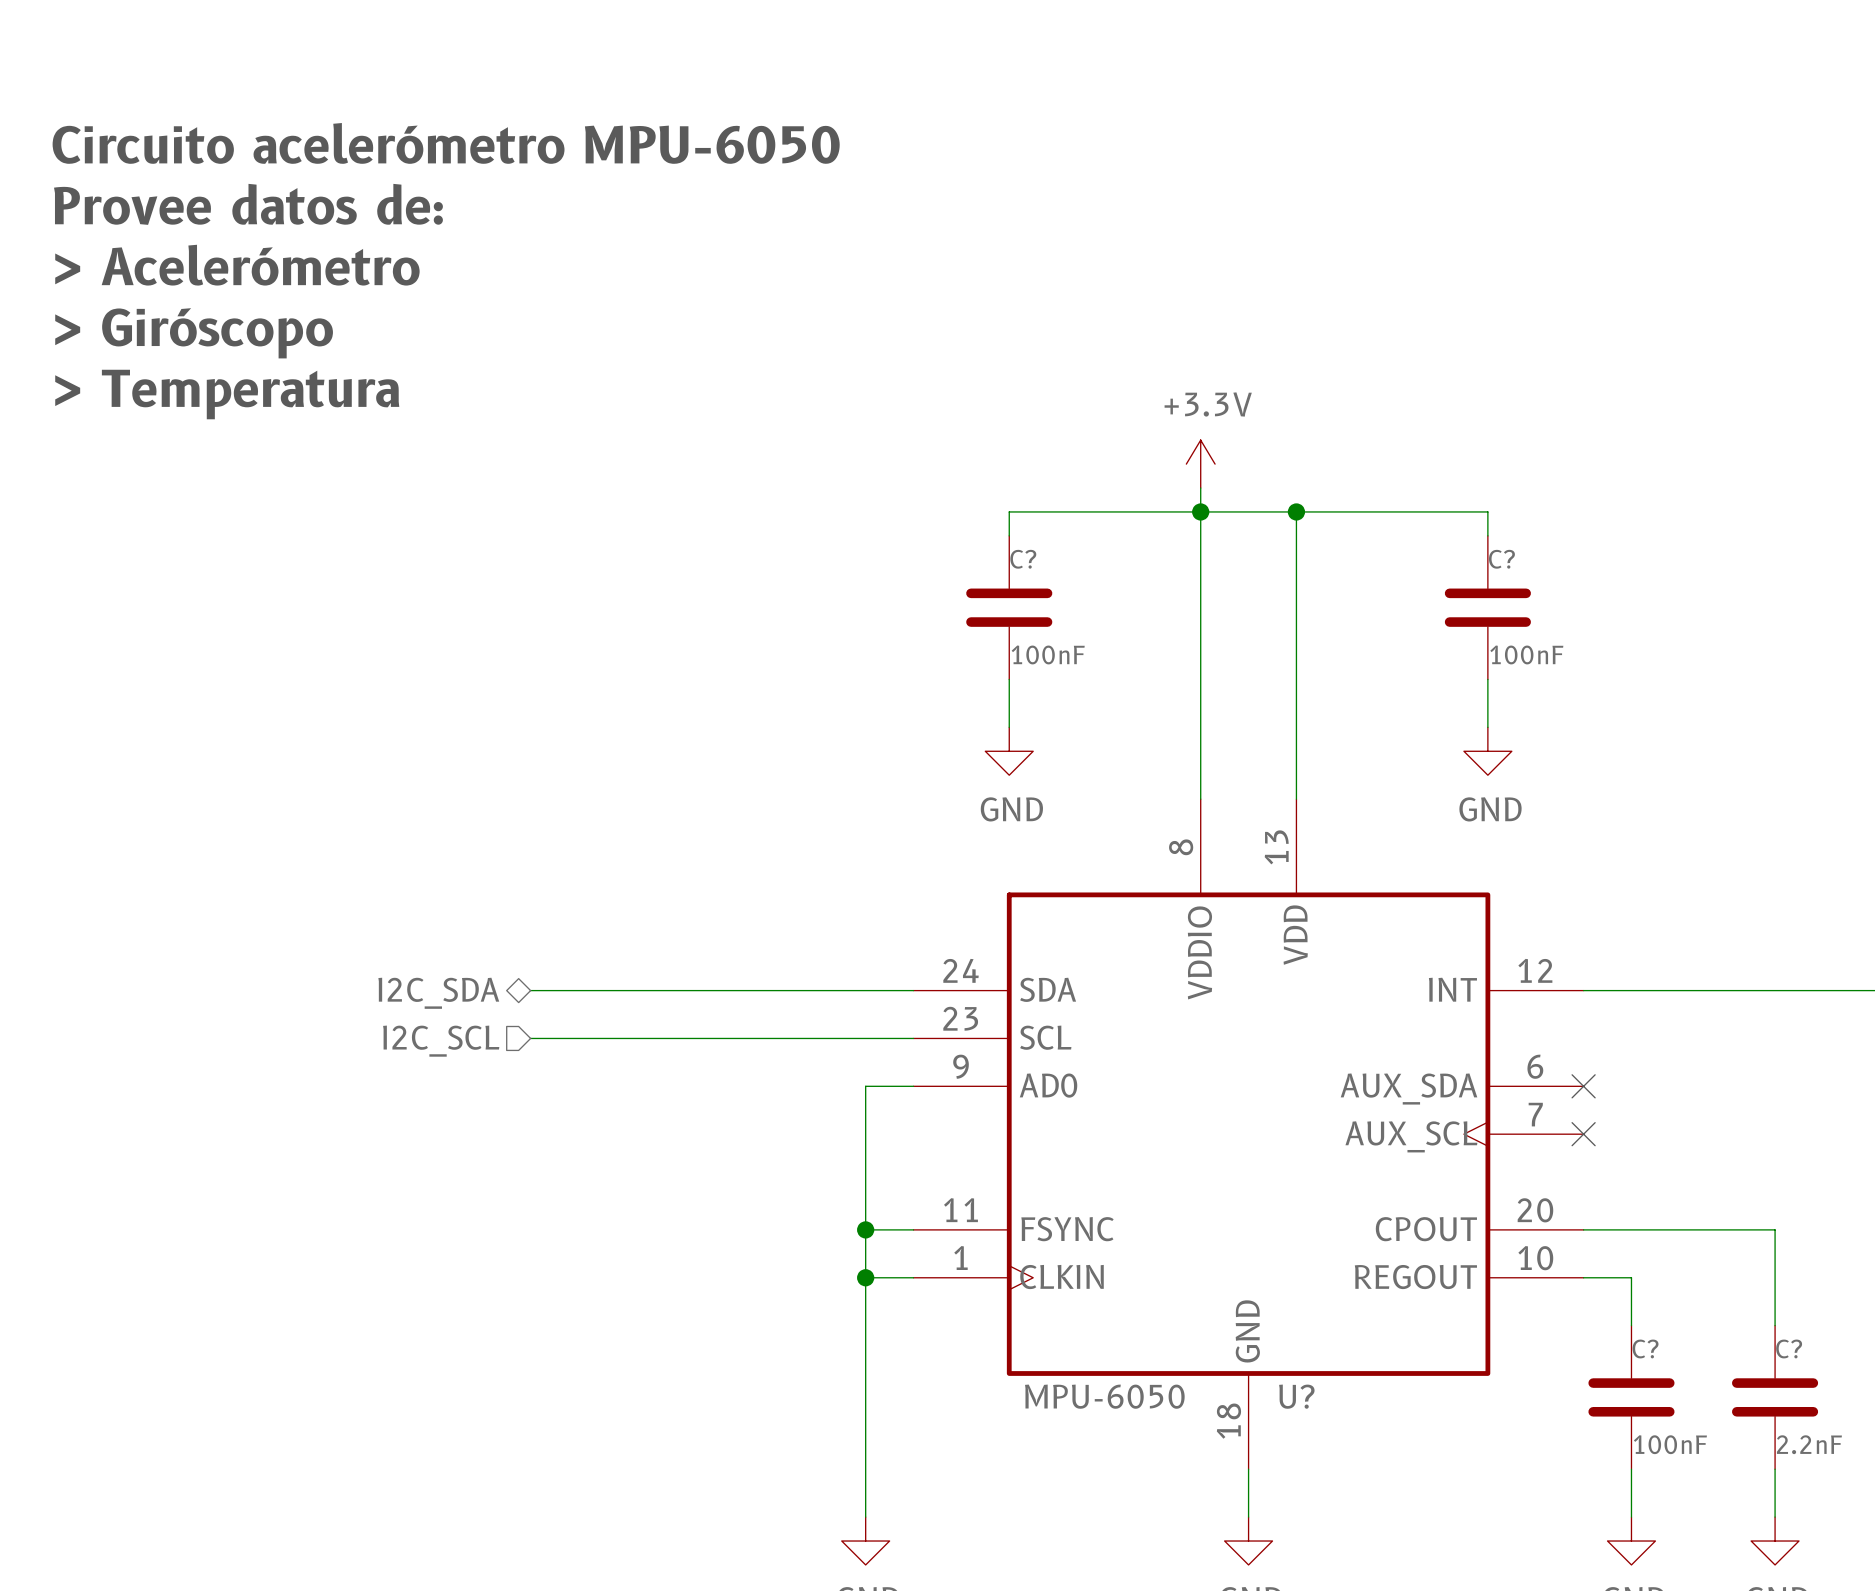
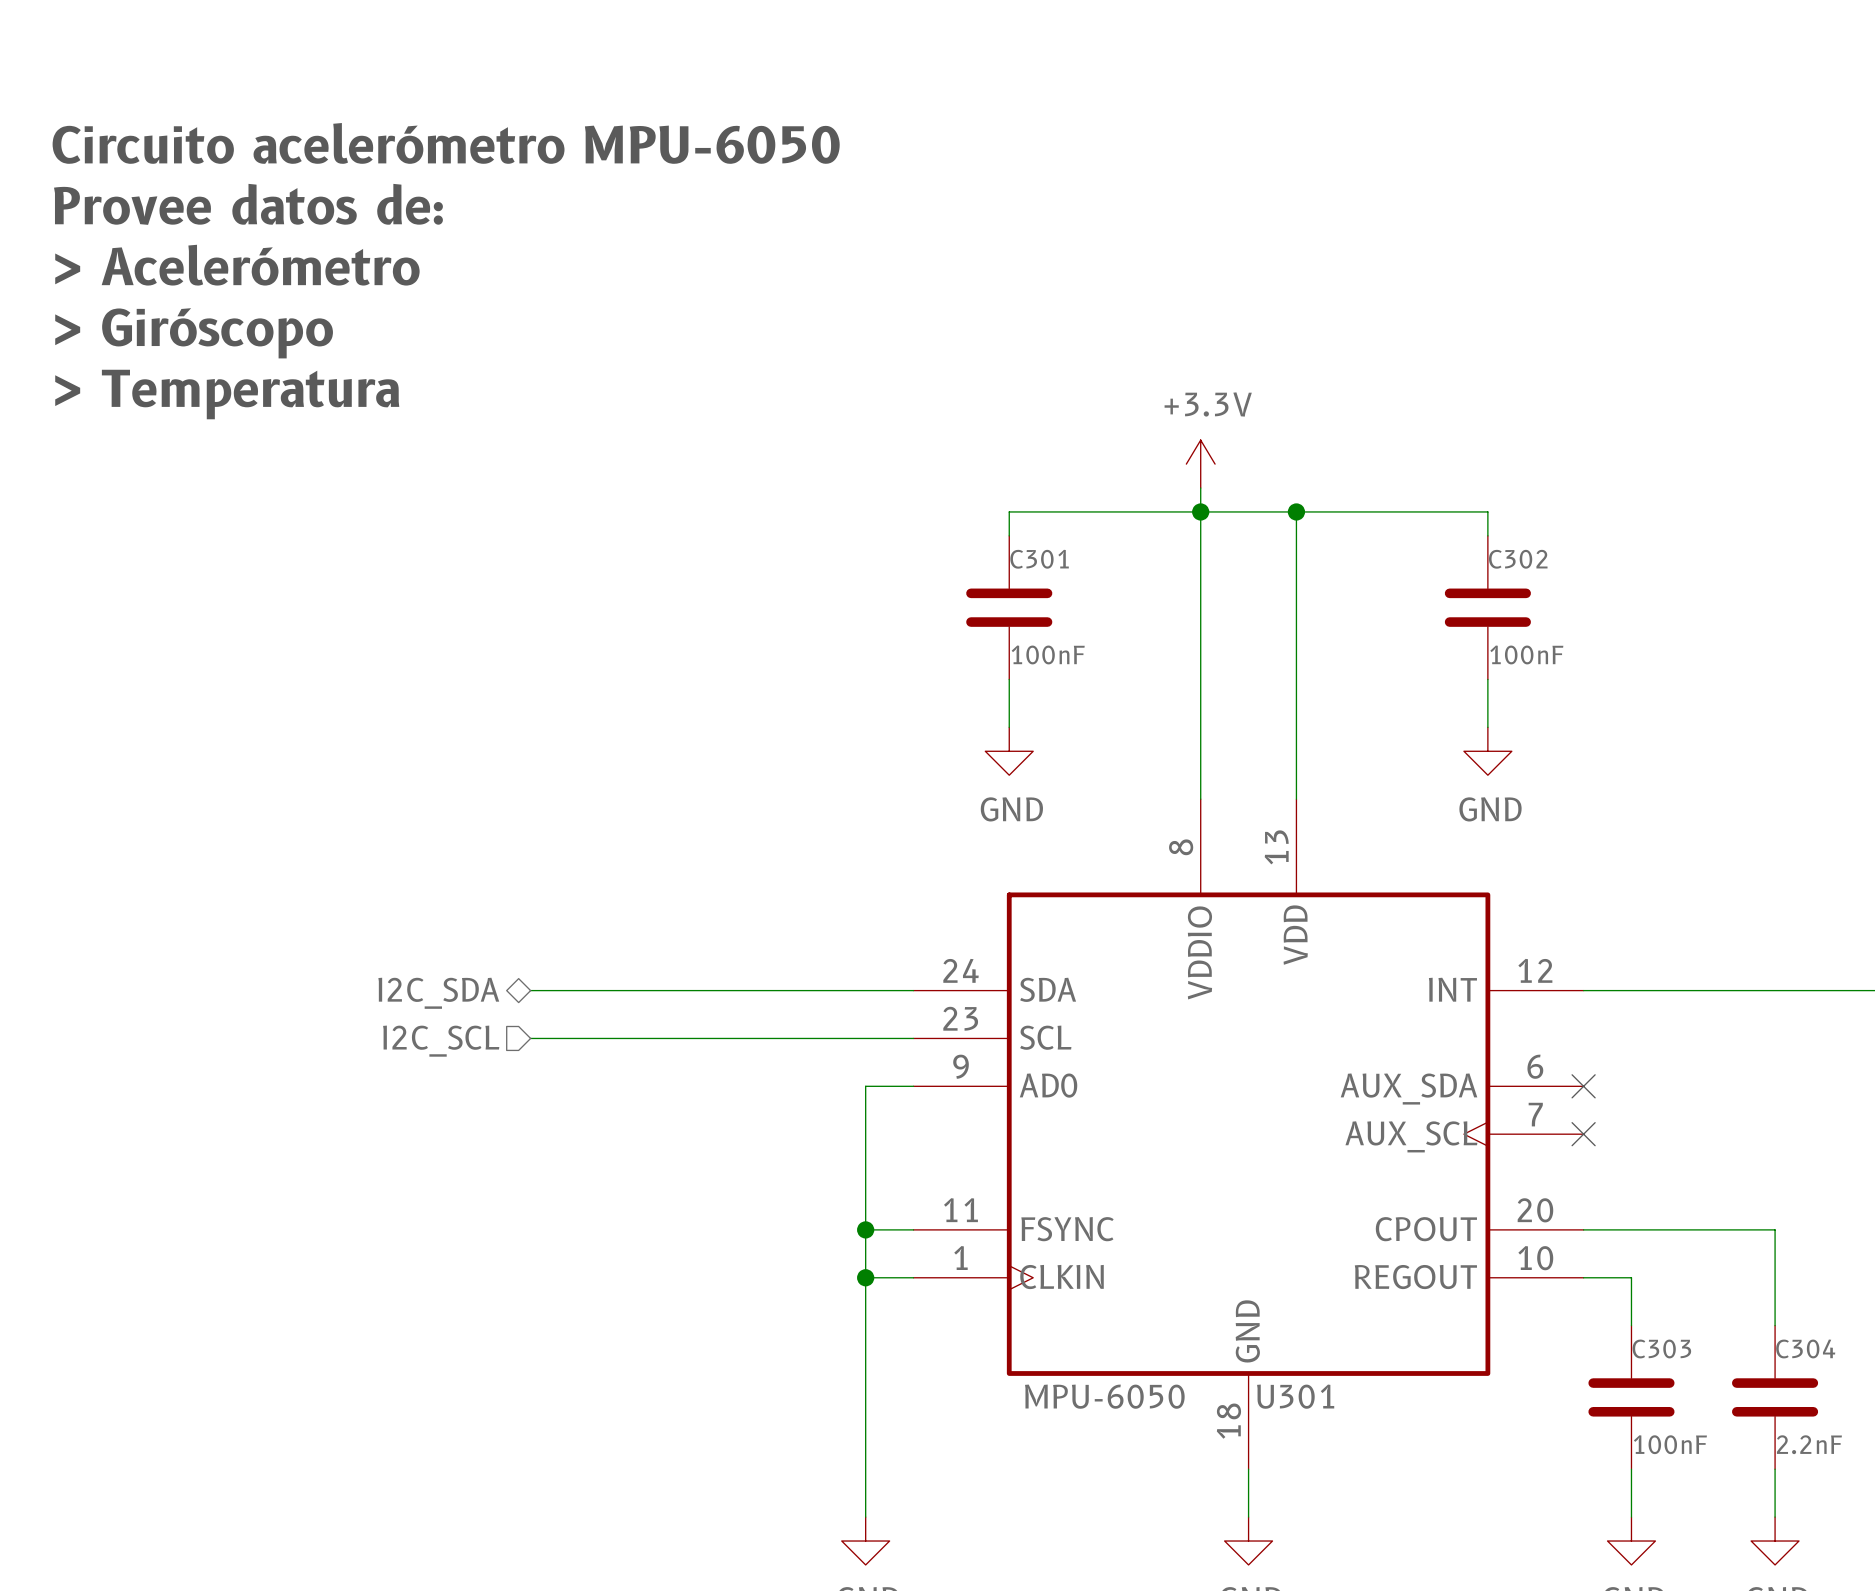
C? name: C? (1023, 559) -> C301 (1039, 559)
C? name: C? (1501, 559) -> C302 (1518, 559)
C? name: C? (1645, 1348) -> C303 (1661, 1348)
C? name: C? (1789, 1348) -> C304 (1805, 1348)
U? name: U? (1296, 1396) -> U301 (1295, 1396)

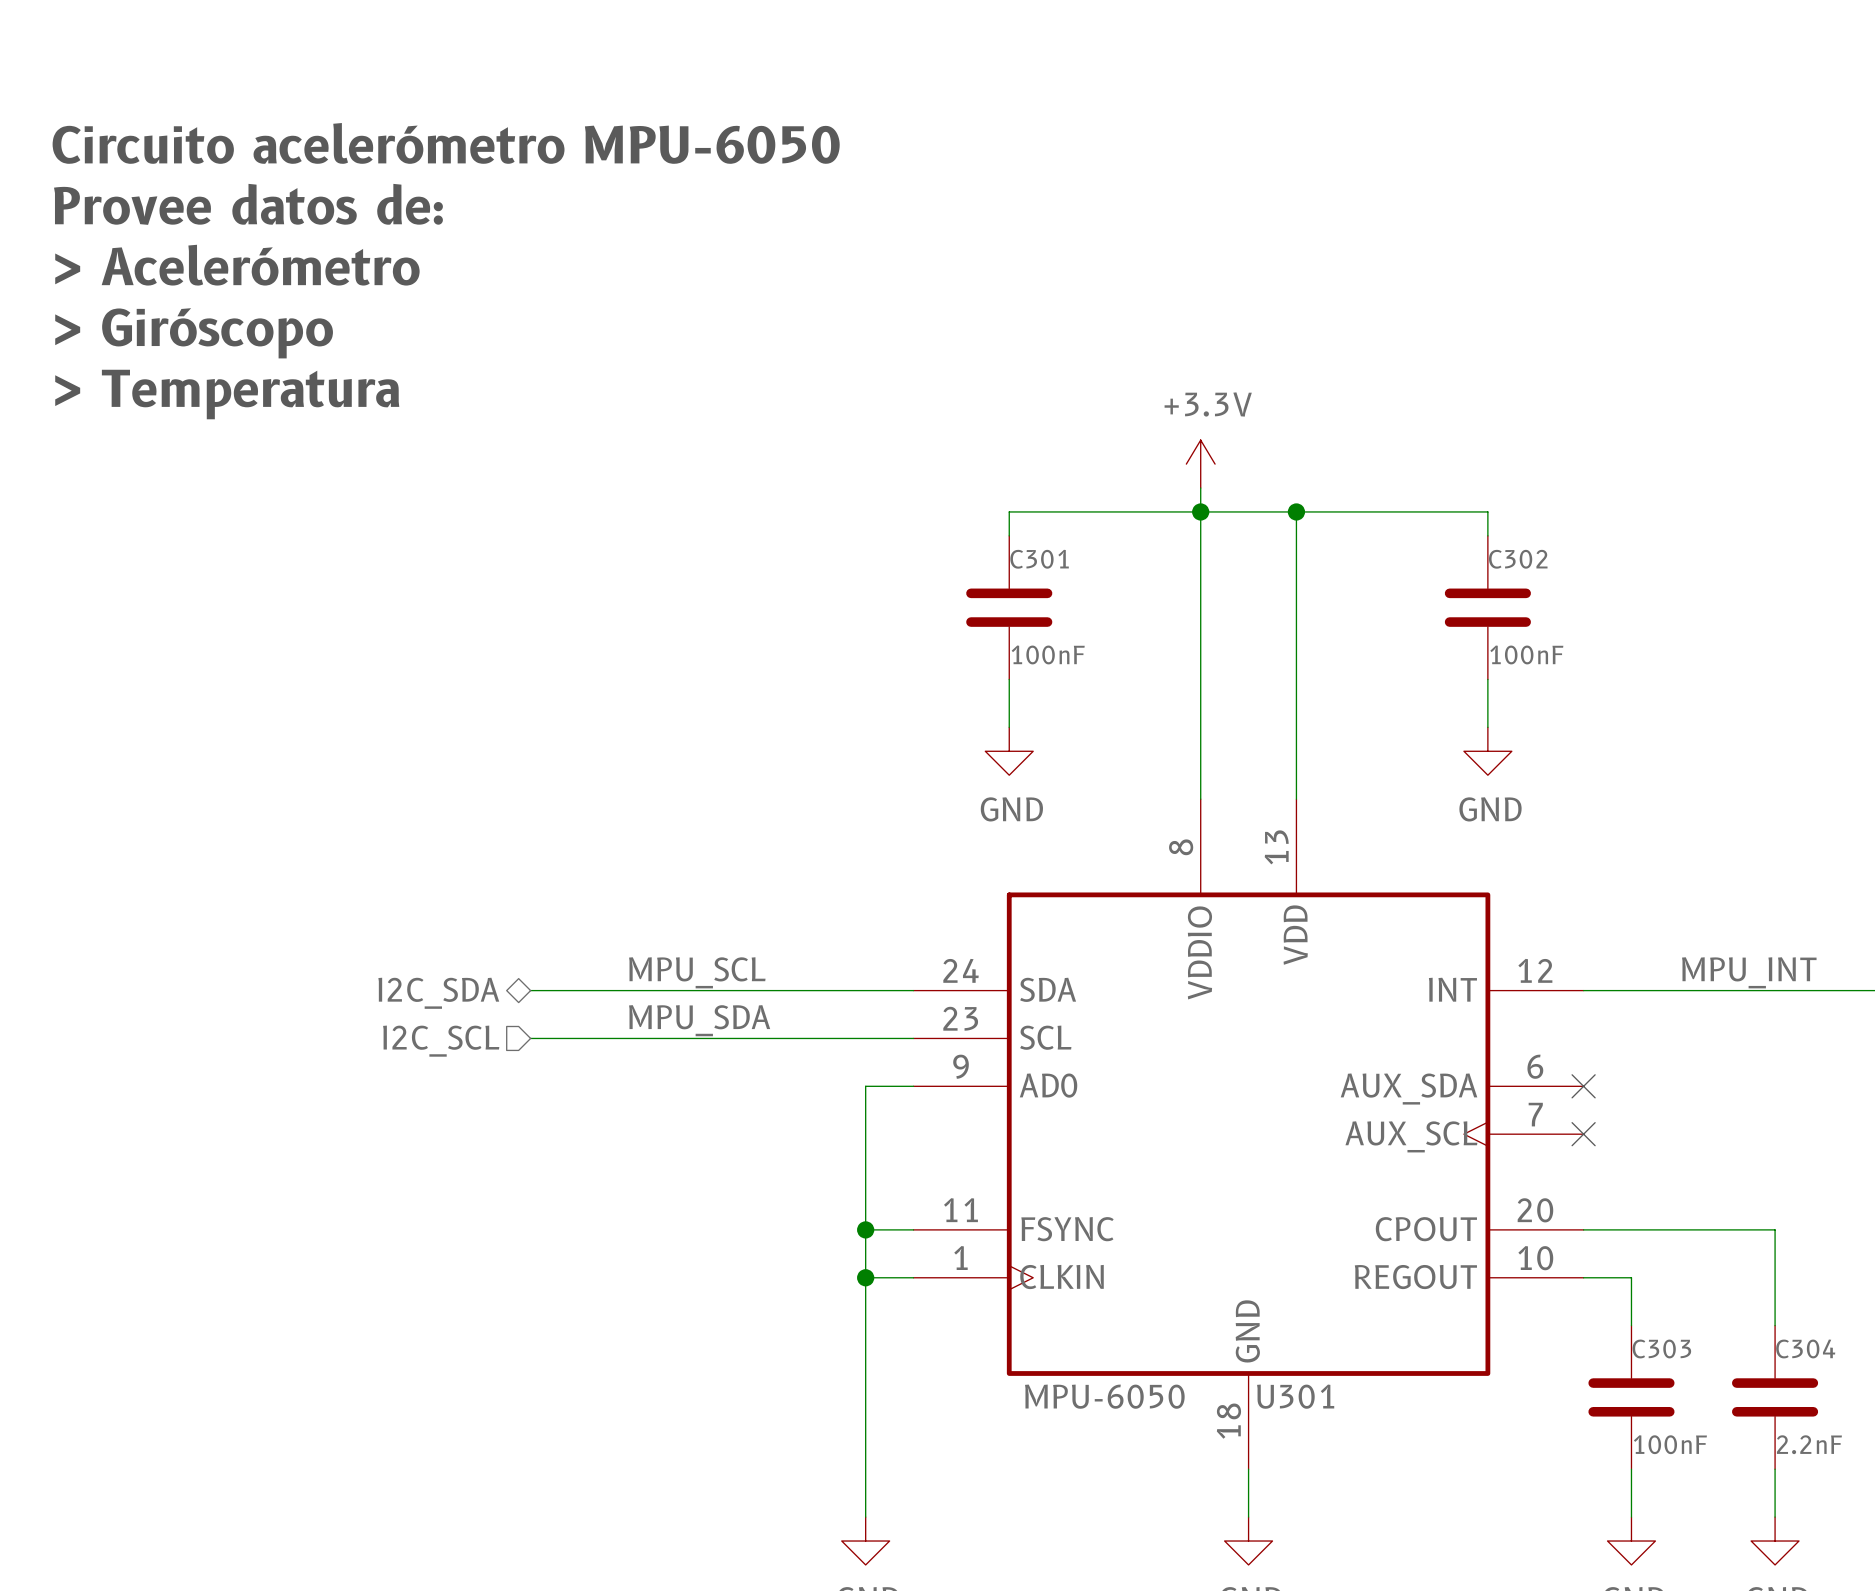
label: none -> MPU_SCL (697, 972)
label: none -> MPU_INT (1749, 972)
label: none -> MPU_SDA (699, 1020)

